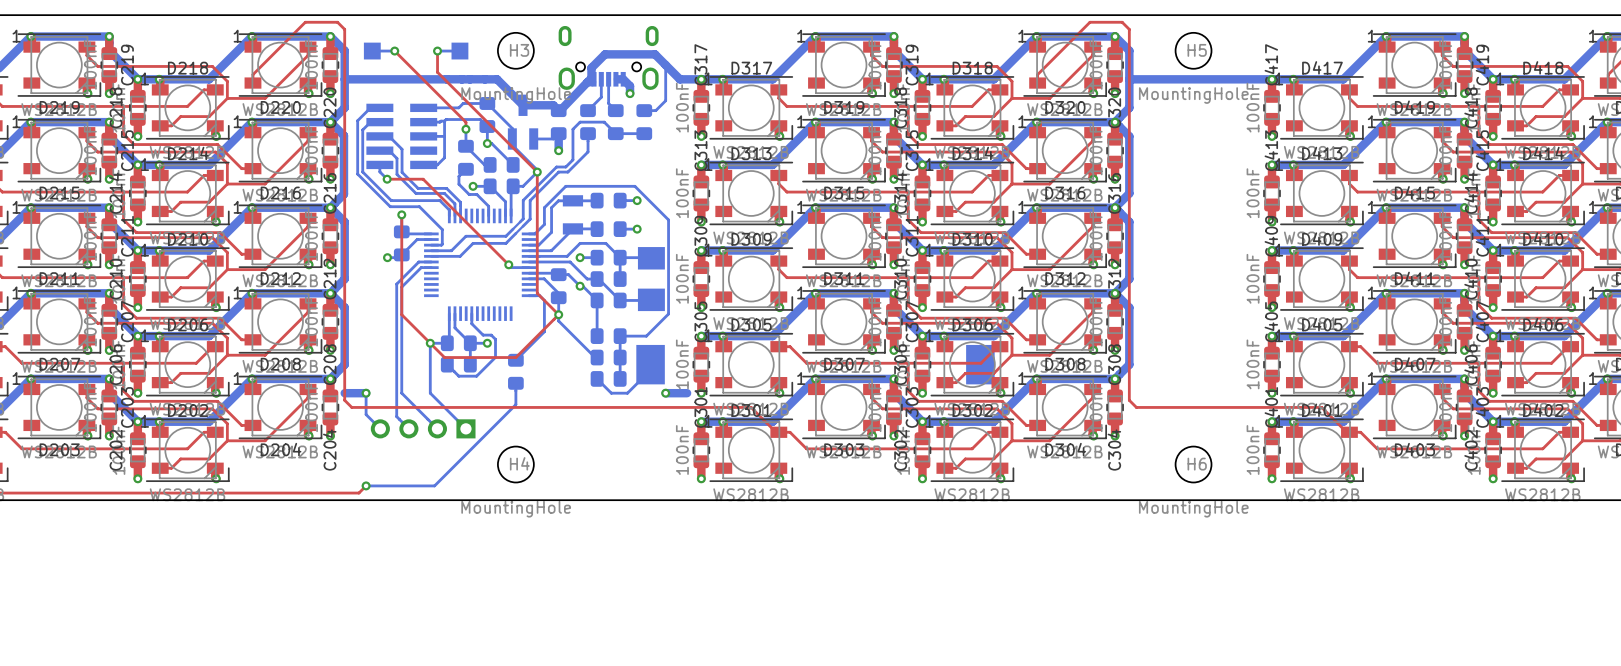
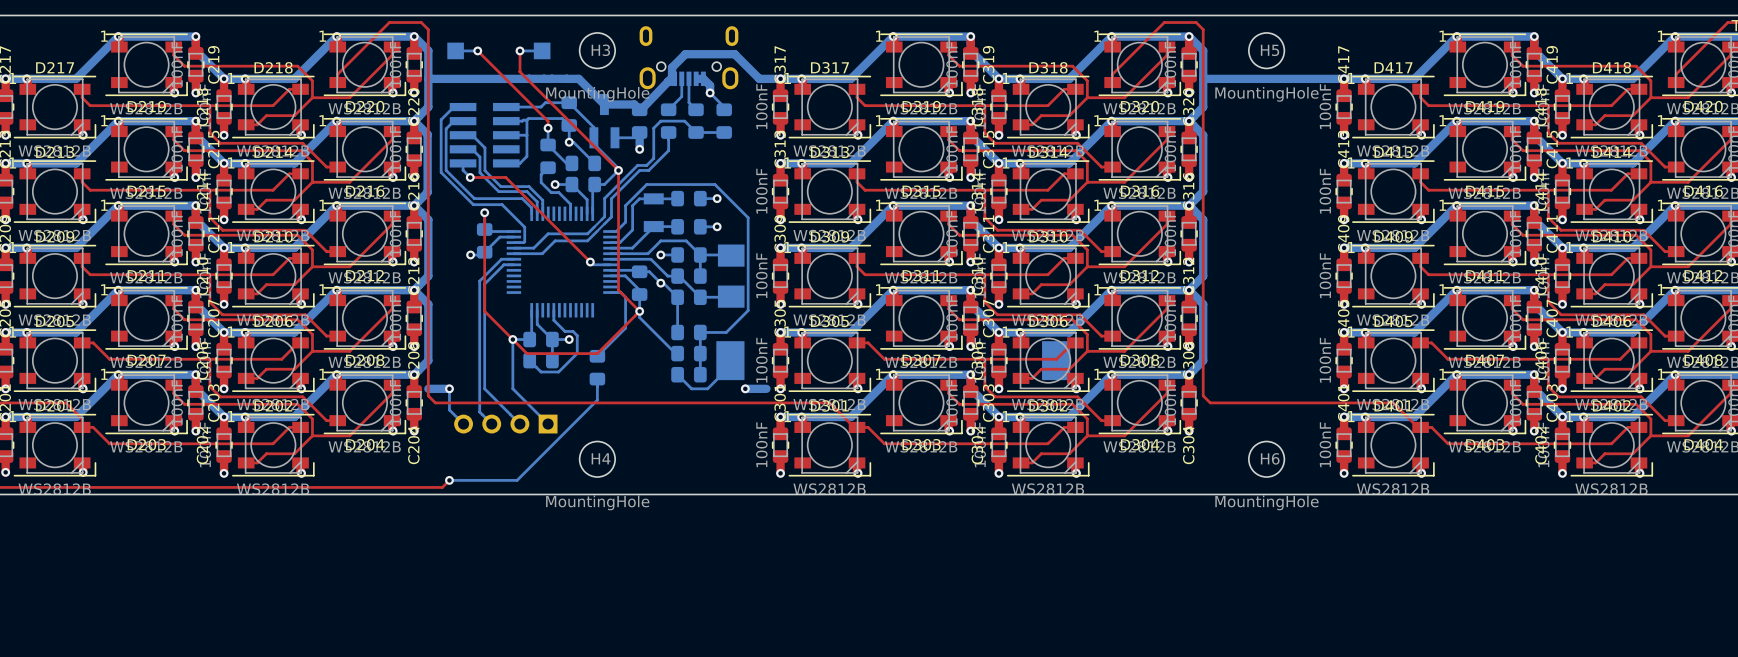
bottom track: (665, 65) (665, 100) (655, 110) (644, 110) -> (710, 92) (724, 107) (724, 109)

